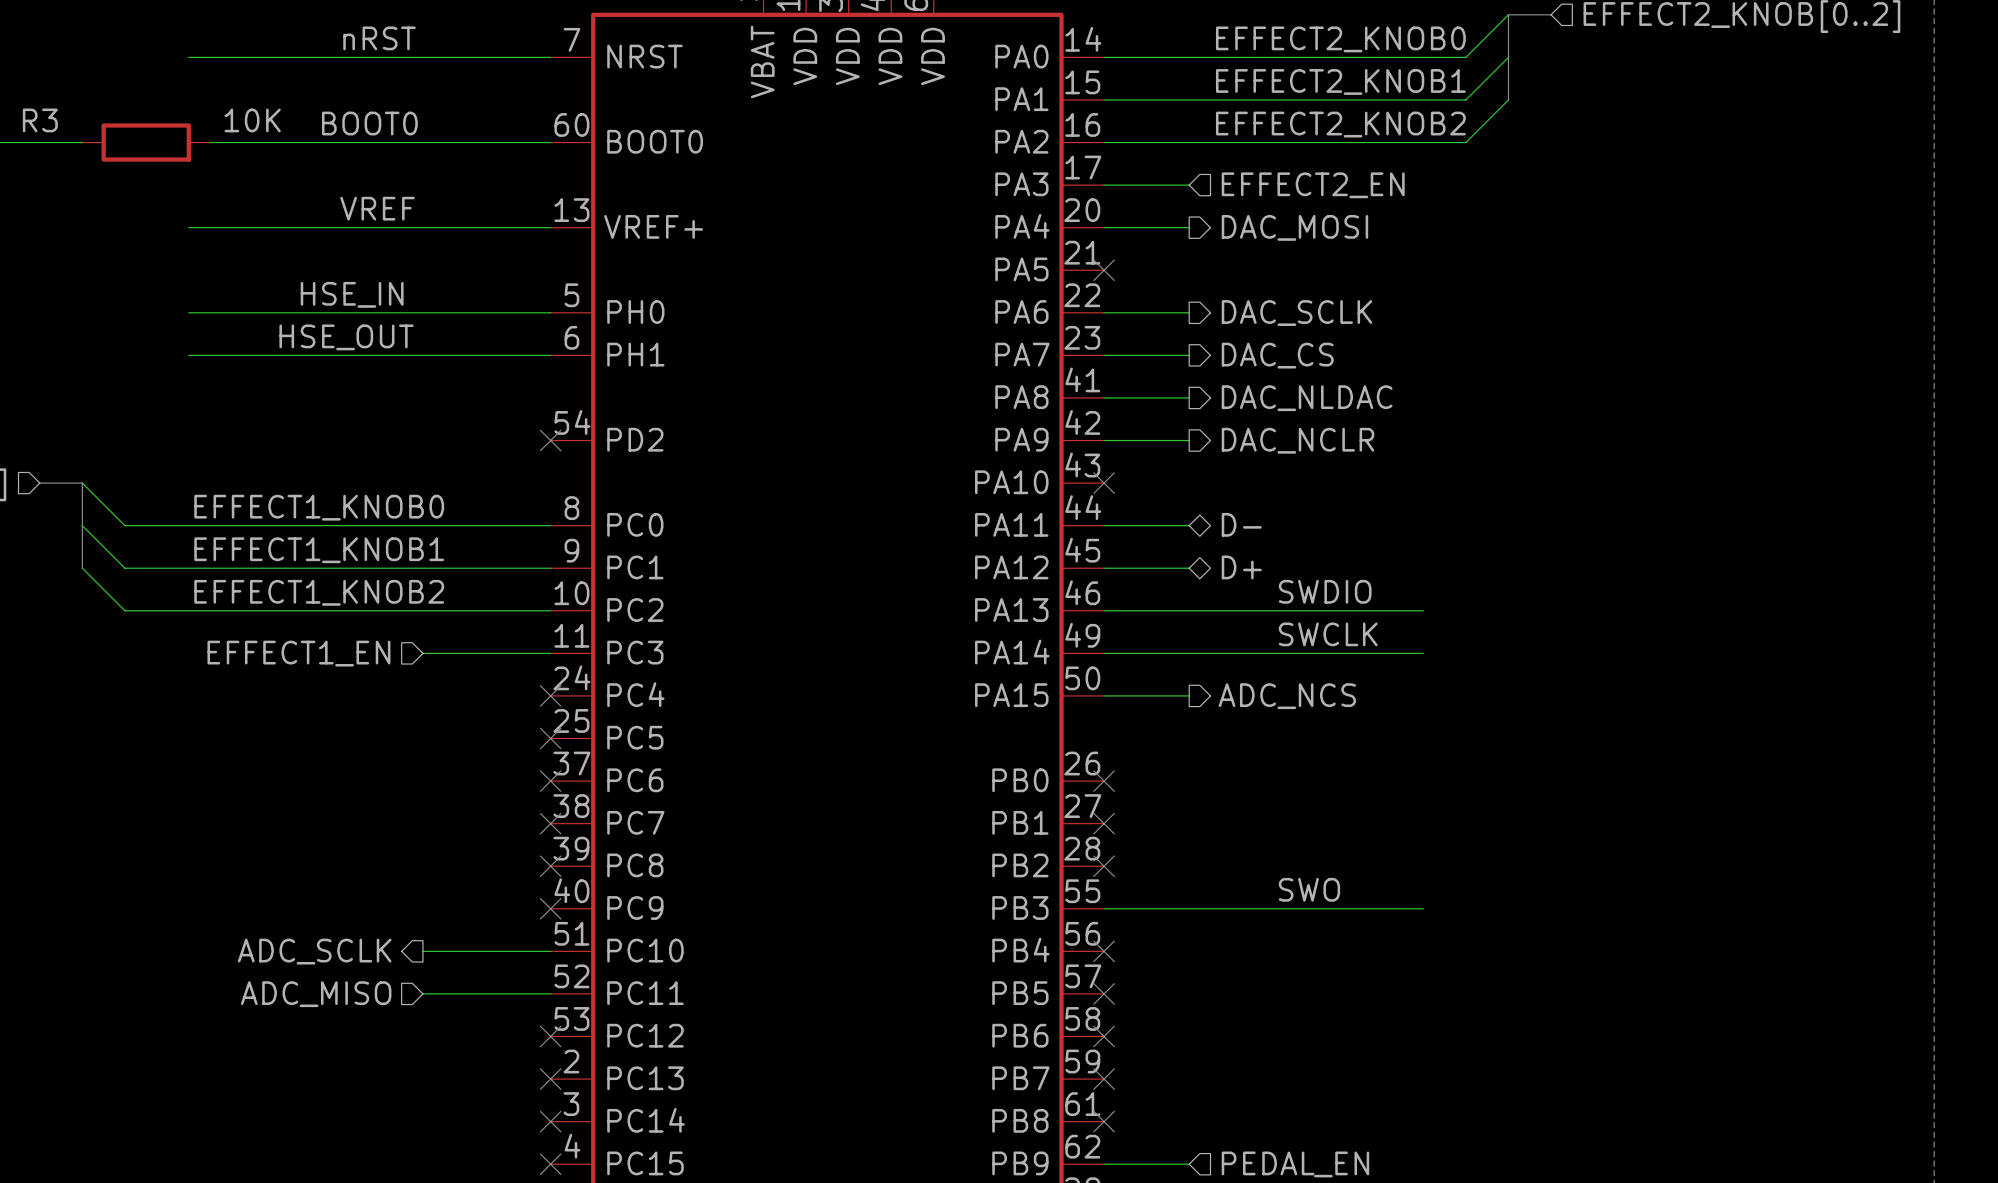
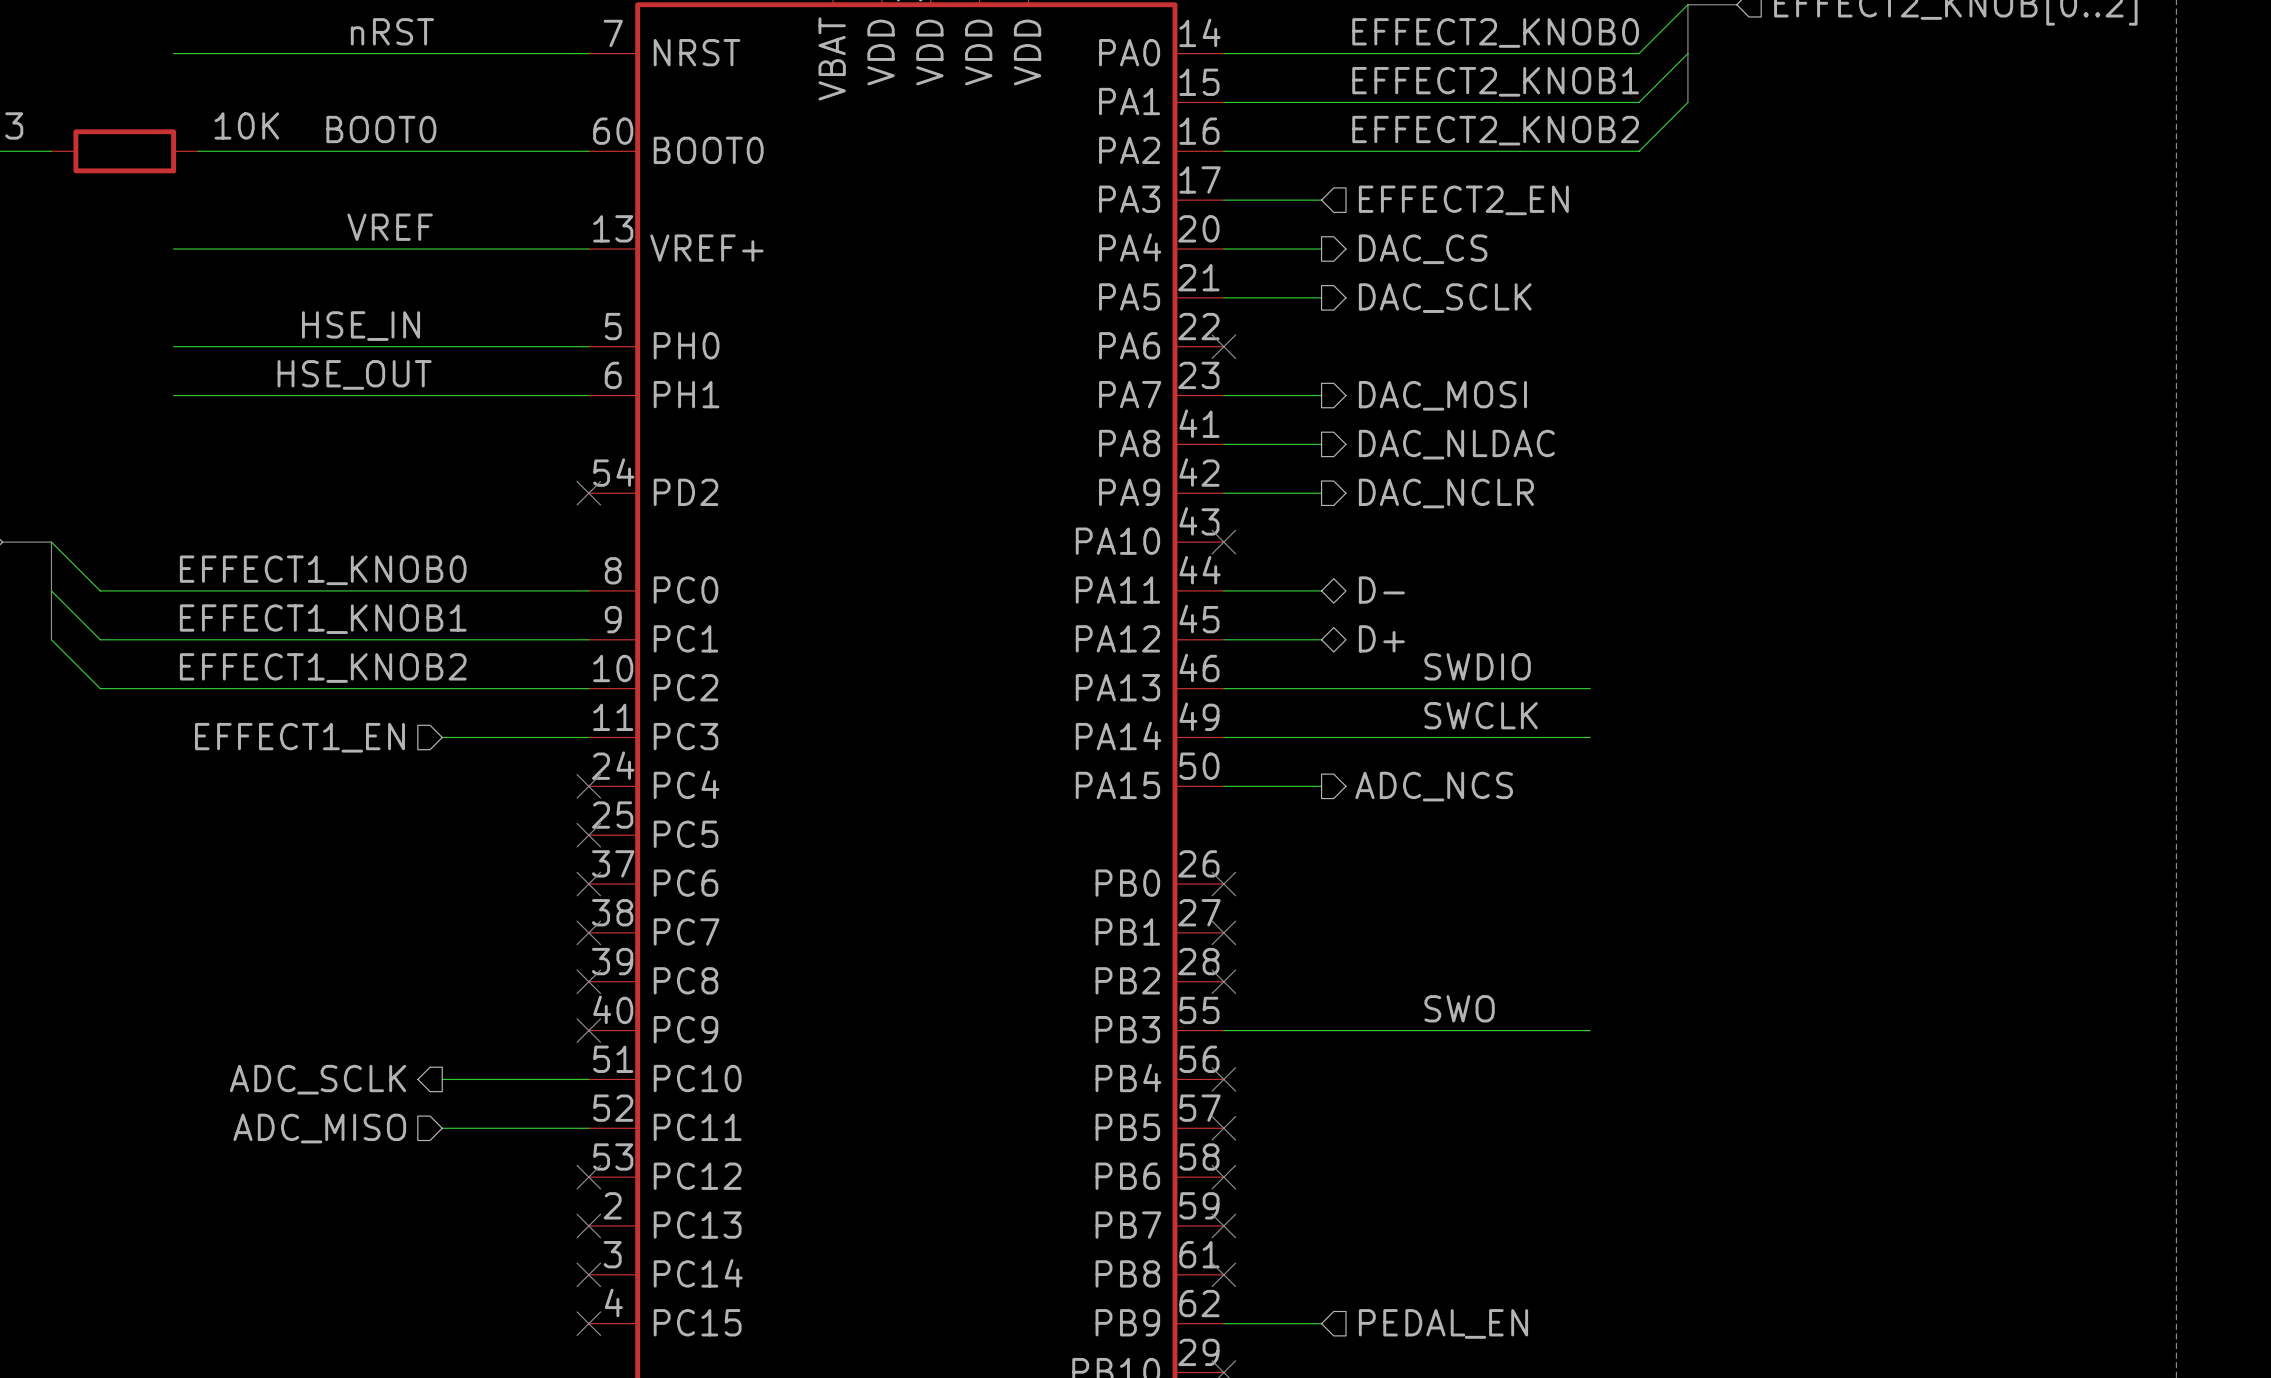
hierarchical label: DAC_MOSI (1294, 227) -> DAC_CS (1423, 249)
no-connect mark position: (1104, 270) -> (1223, 346)
wire: (1104, 312) (1189, 312) -> (1223, 297) (1321, 297)
hierarchical label position: DAC_SCLK (1296, 313) -> DAC_SCLK (1445, 298)
hierarchical label: DAC_CS (1277, 355) -> DAC_MOSI (1442, 395)

